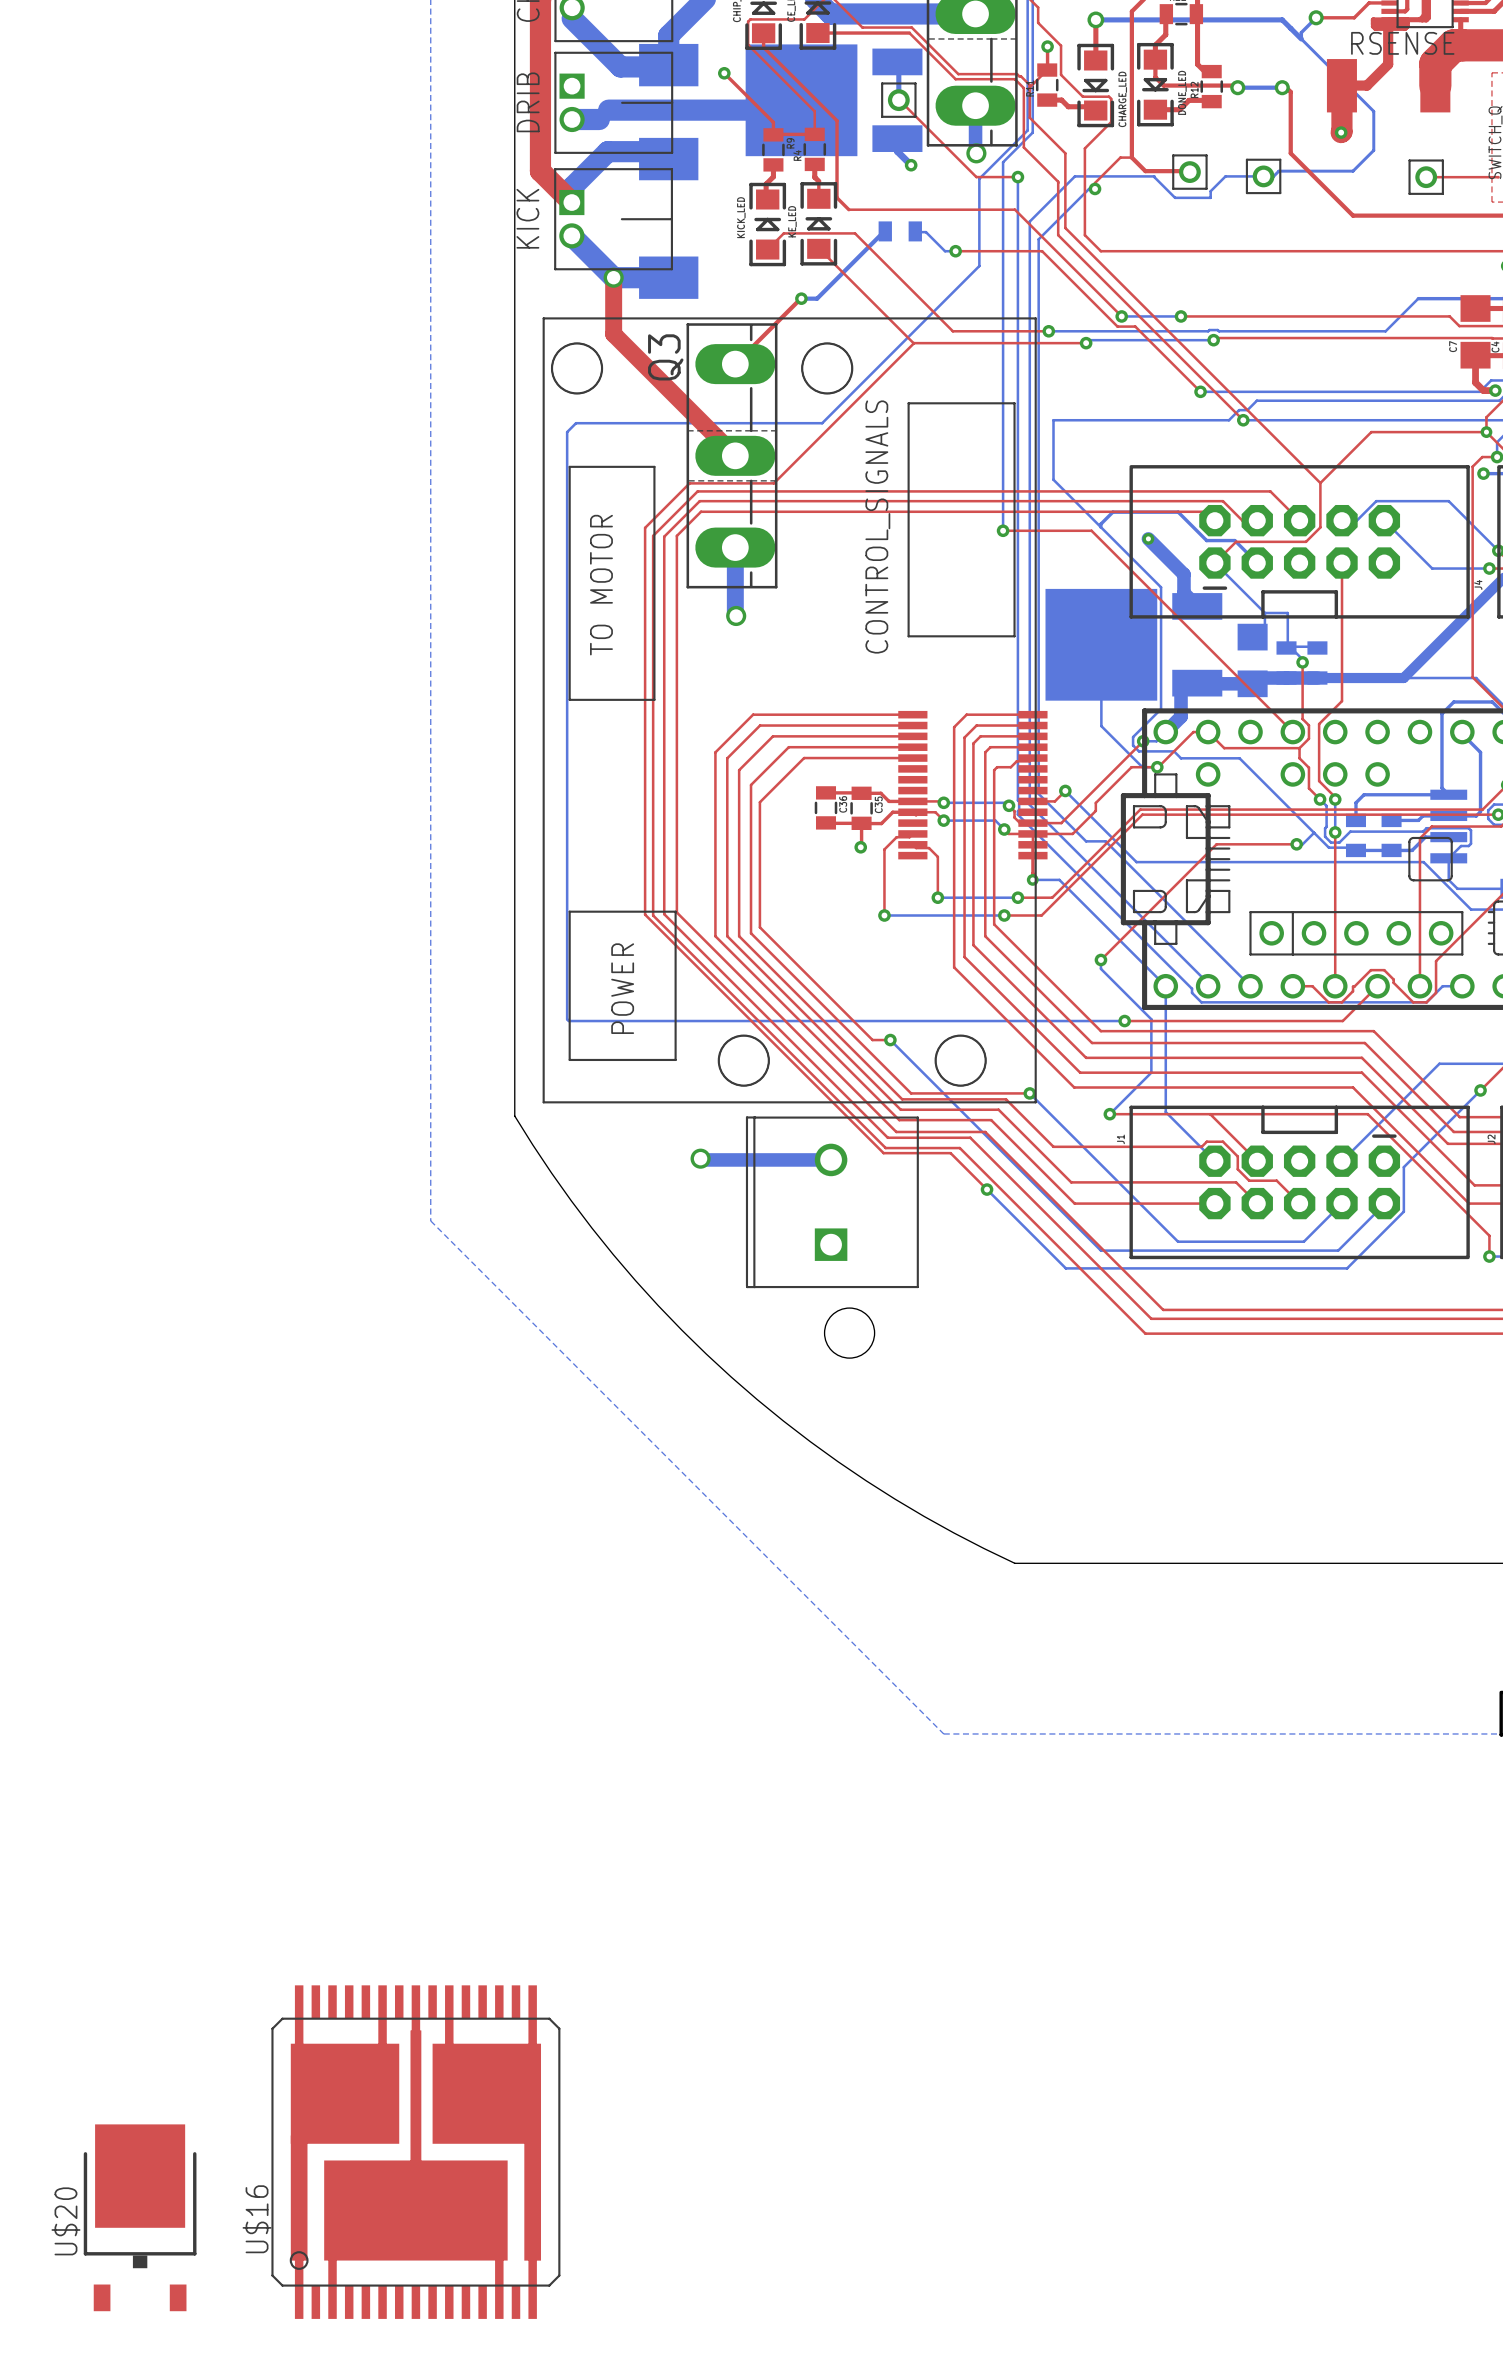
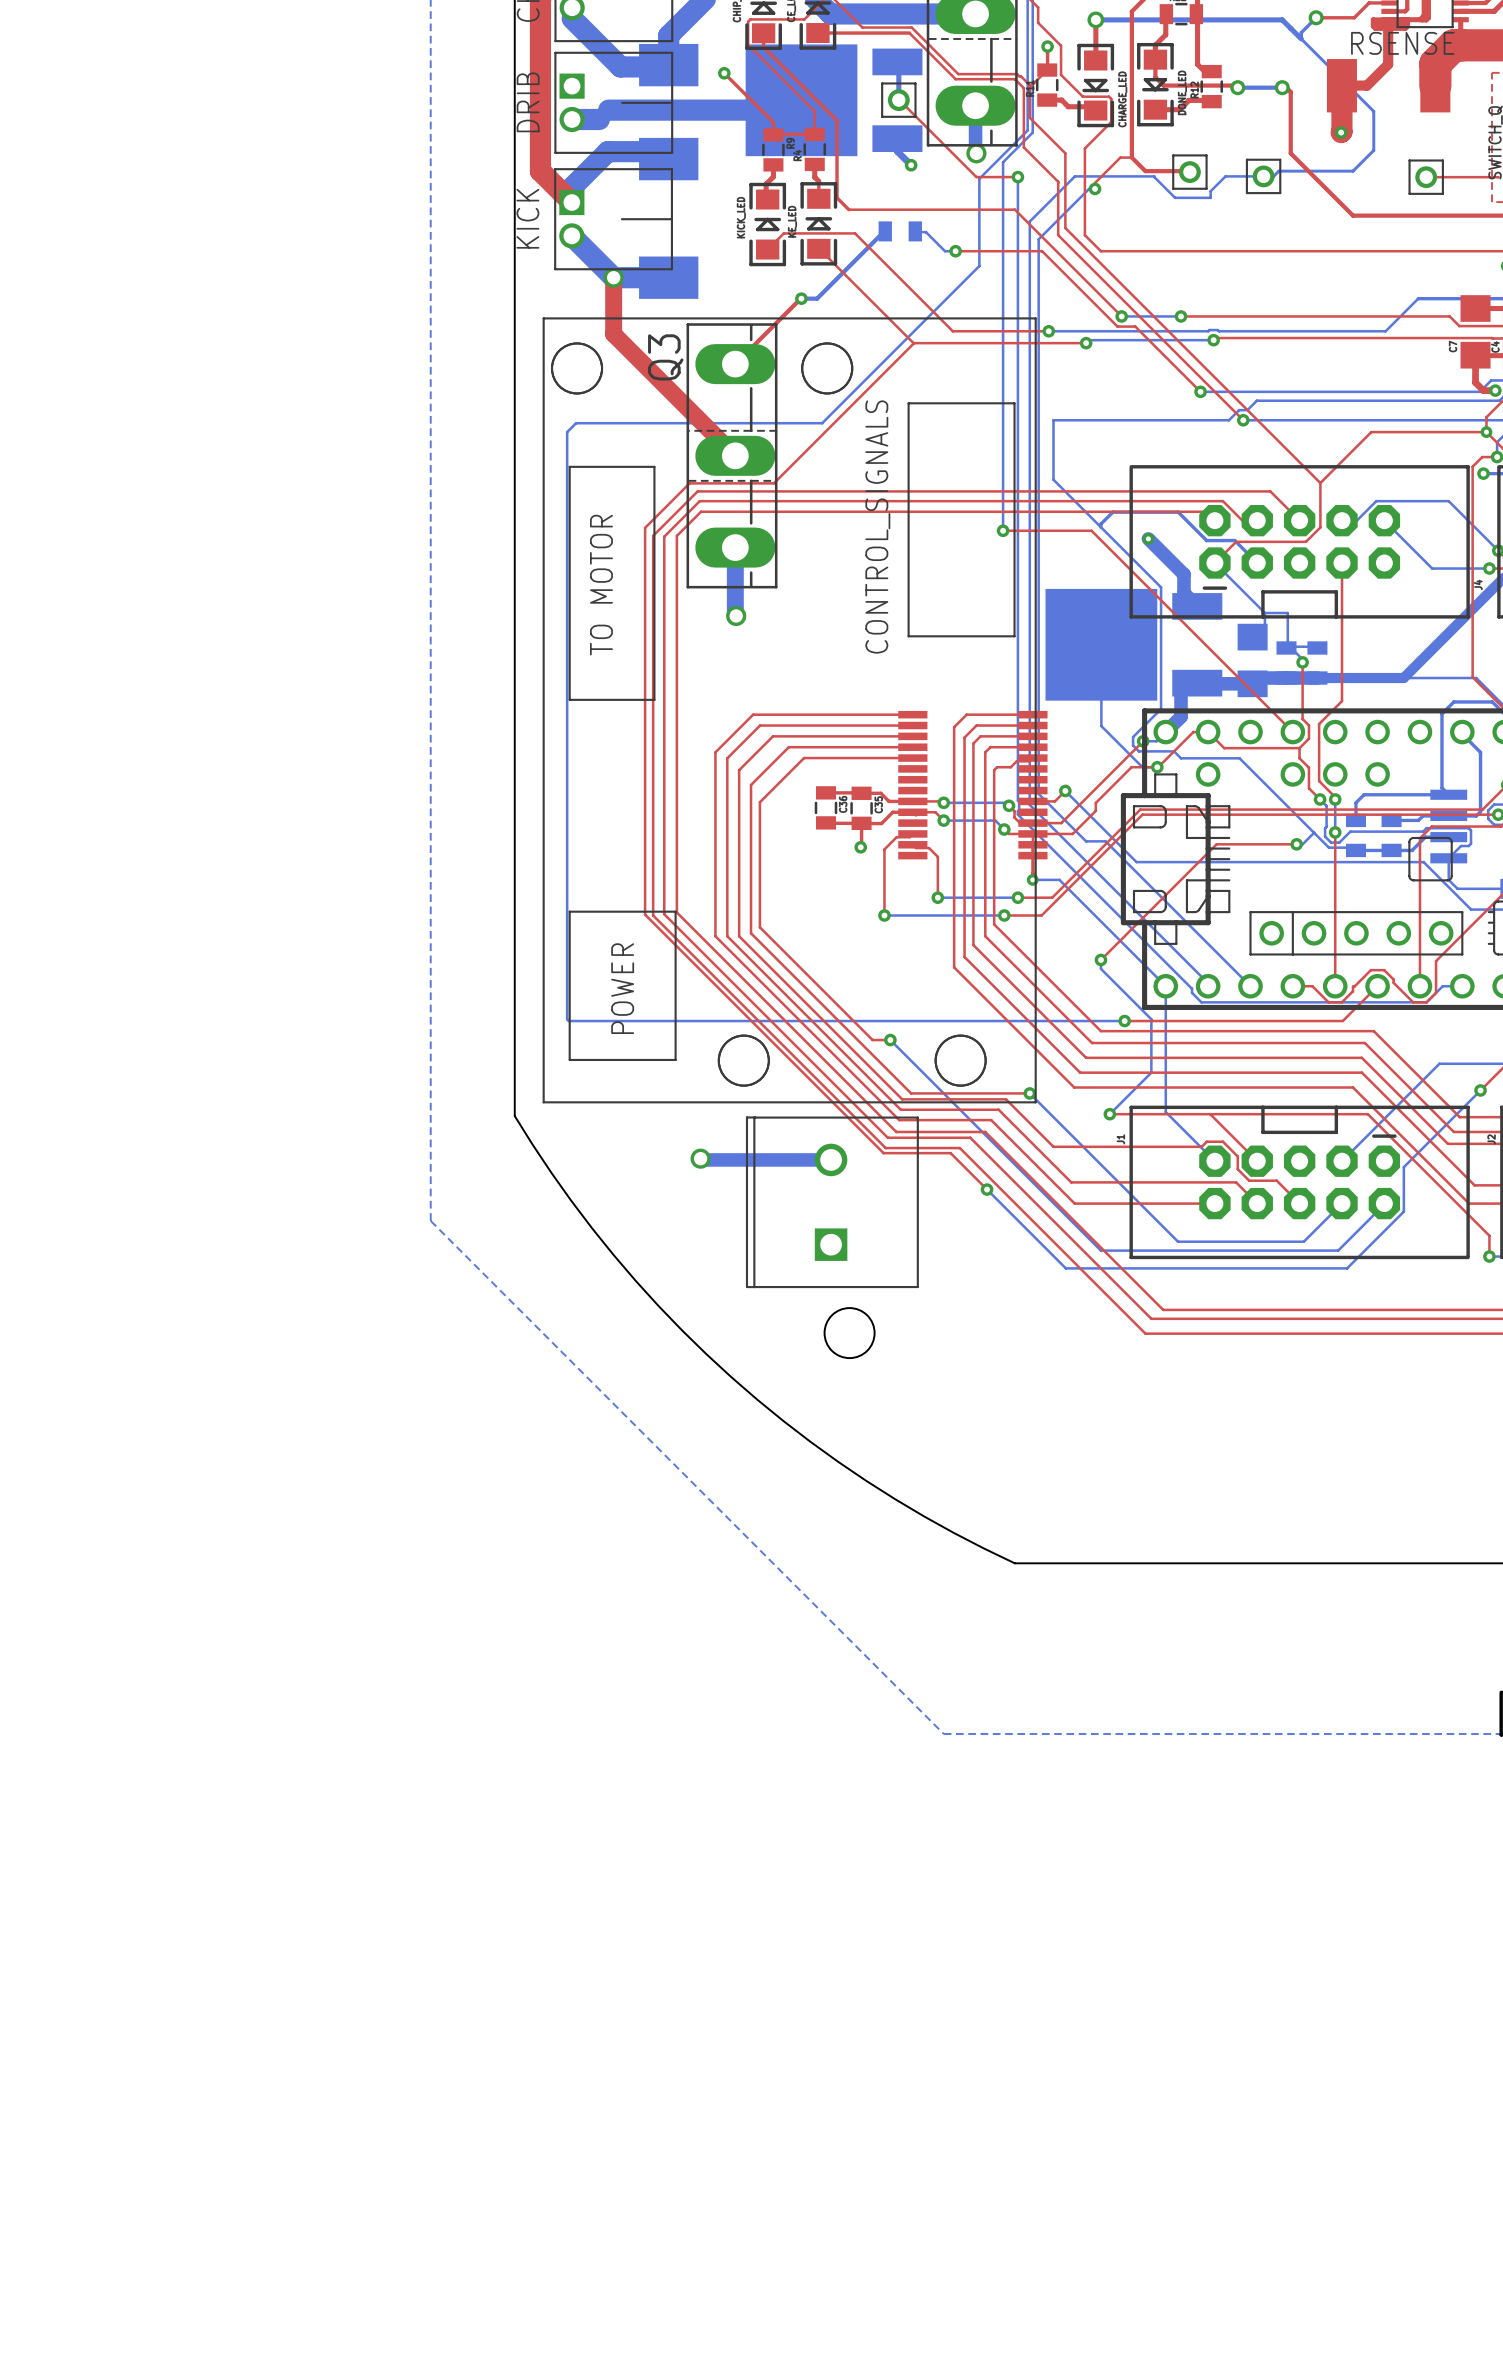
U$16: (415, 2152) -> none
U$20: (140, 2217) -> none

